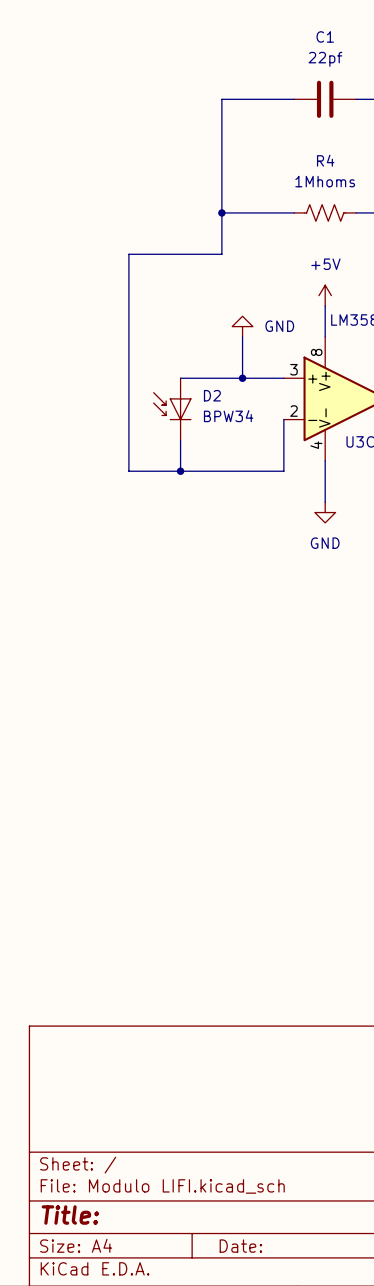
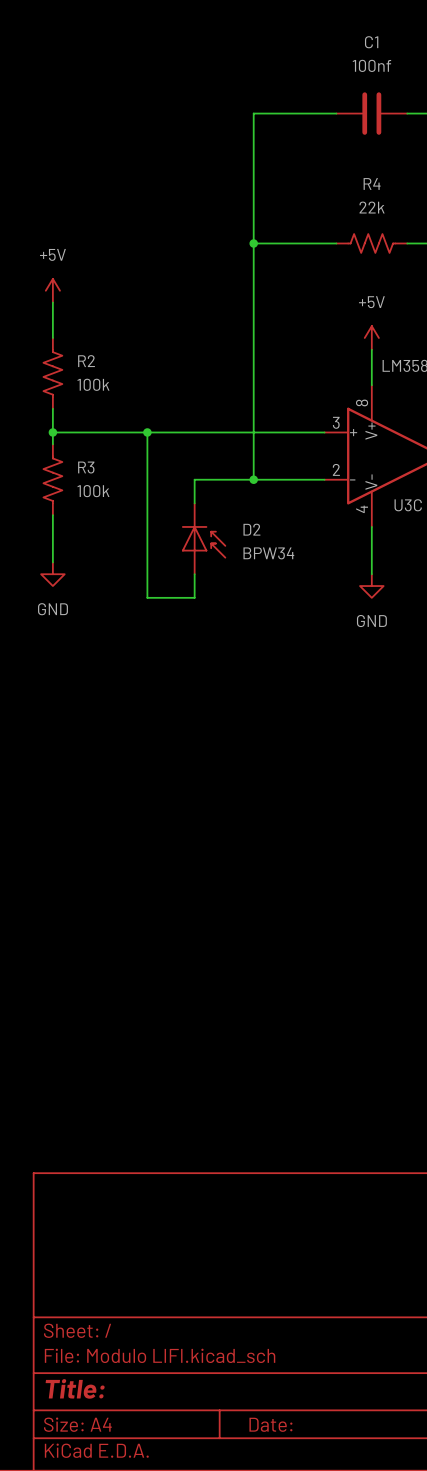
C1 value: 22pf (325, 59) -> 100nf (371, 65)
R4 value: 1Mhoms (325, 181) -> 22k (372, 207)
power symbol: none -> +5V (52, 290)
wire: (221, 254) (128, 254) (128, 378) -> (253, 290) (253, 479)
wire: none -> (52, 302) (52, 337)
R2: none -> 100k (52, 373)
power symbol: GND (242, 326) -> none
wire: (242, 336) (242, 378) -> none
wire: none -> (52, 432) (206, 432)
junction: none -> (52, 432)
junction: none -> (147, 432)
junction: (242, 378) -> none
D2 rotation: 0° (172, 406) -> 180° (203, 541)
D2 position: (172, 409) -> (203, 538)
R3: none -> 100k (52, 479)
junction: none -> (253, 479)
wire: (283, 419) (283, 471) (128, 471) -> (324, 479) (194, 479) (194, 503)
wire: (180, 440) (180, 471) -> (52, 408) (52, 444)
wire: none -> (52, 515) (52, 562)
wire: none -> (147, 538) (147, 597) (194, 597) (194, 574)
junction: (180, 471) -> none
power symbol: none -> GND (52, 574)

